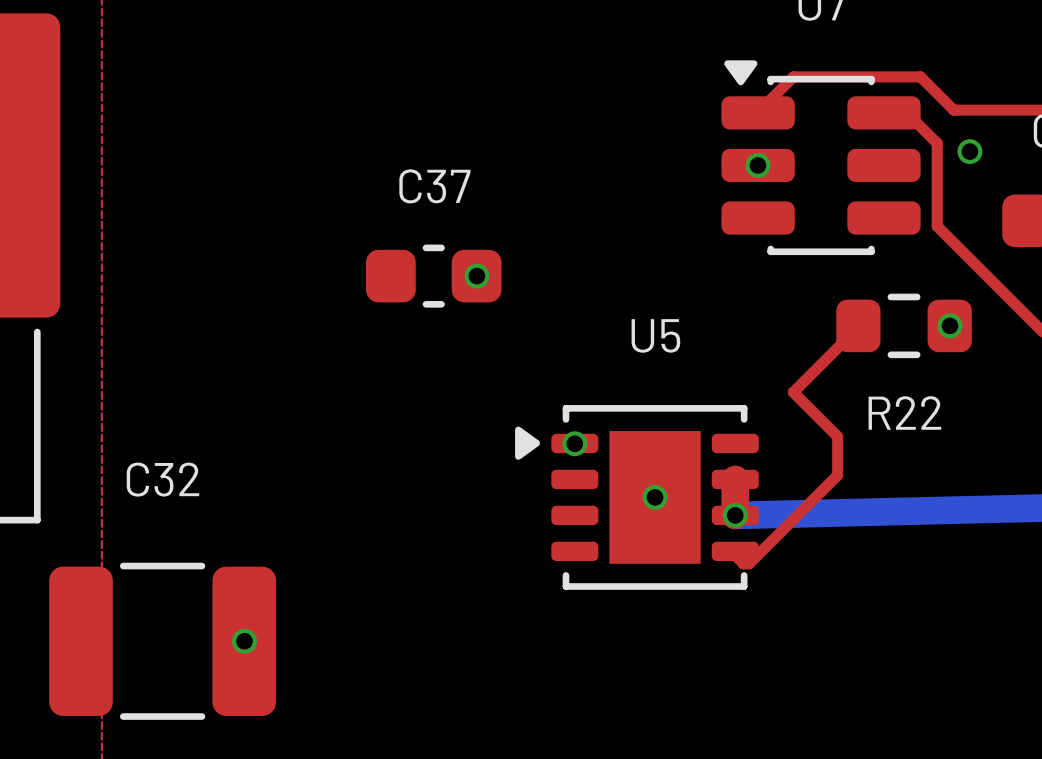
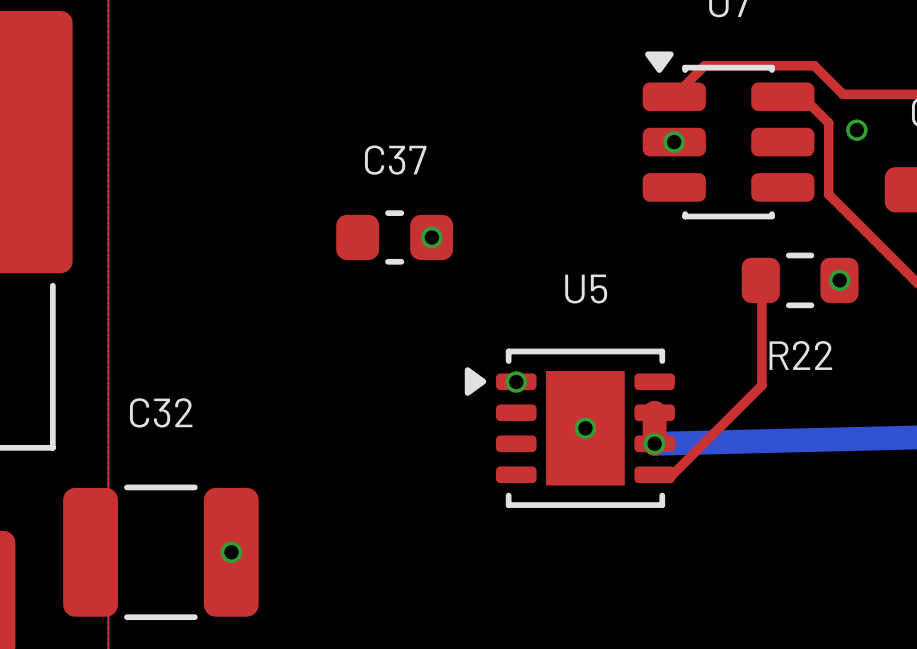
top track: (859, 325) (793, 392) (837, 436) (837, 475) (749, 563) (743, 563) (732, 552) -> (761, 280) (761, 385) (671, 475) (652, 475)

